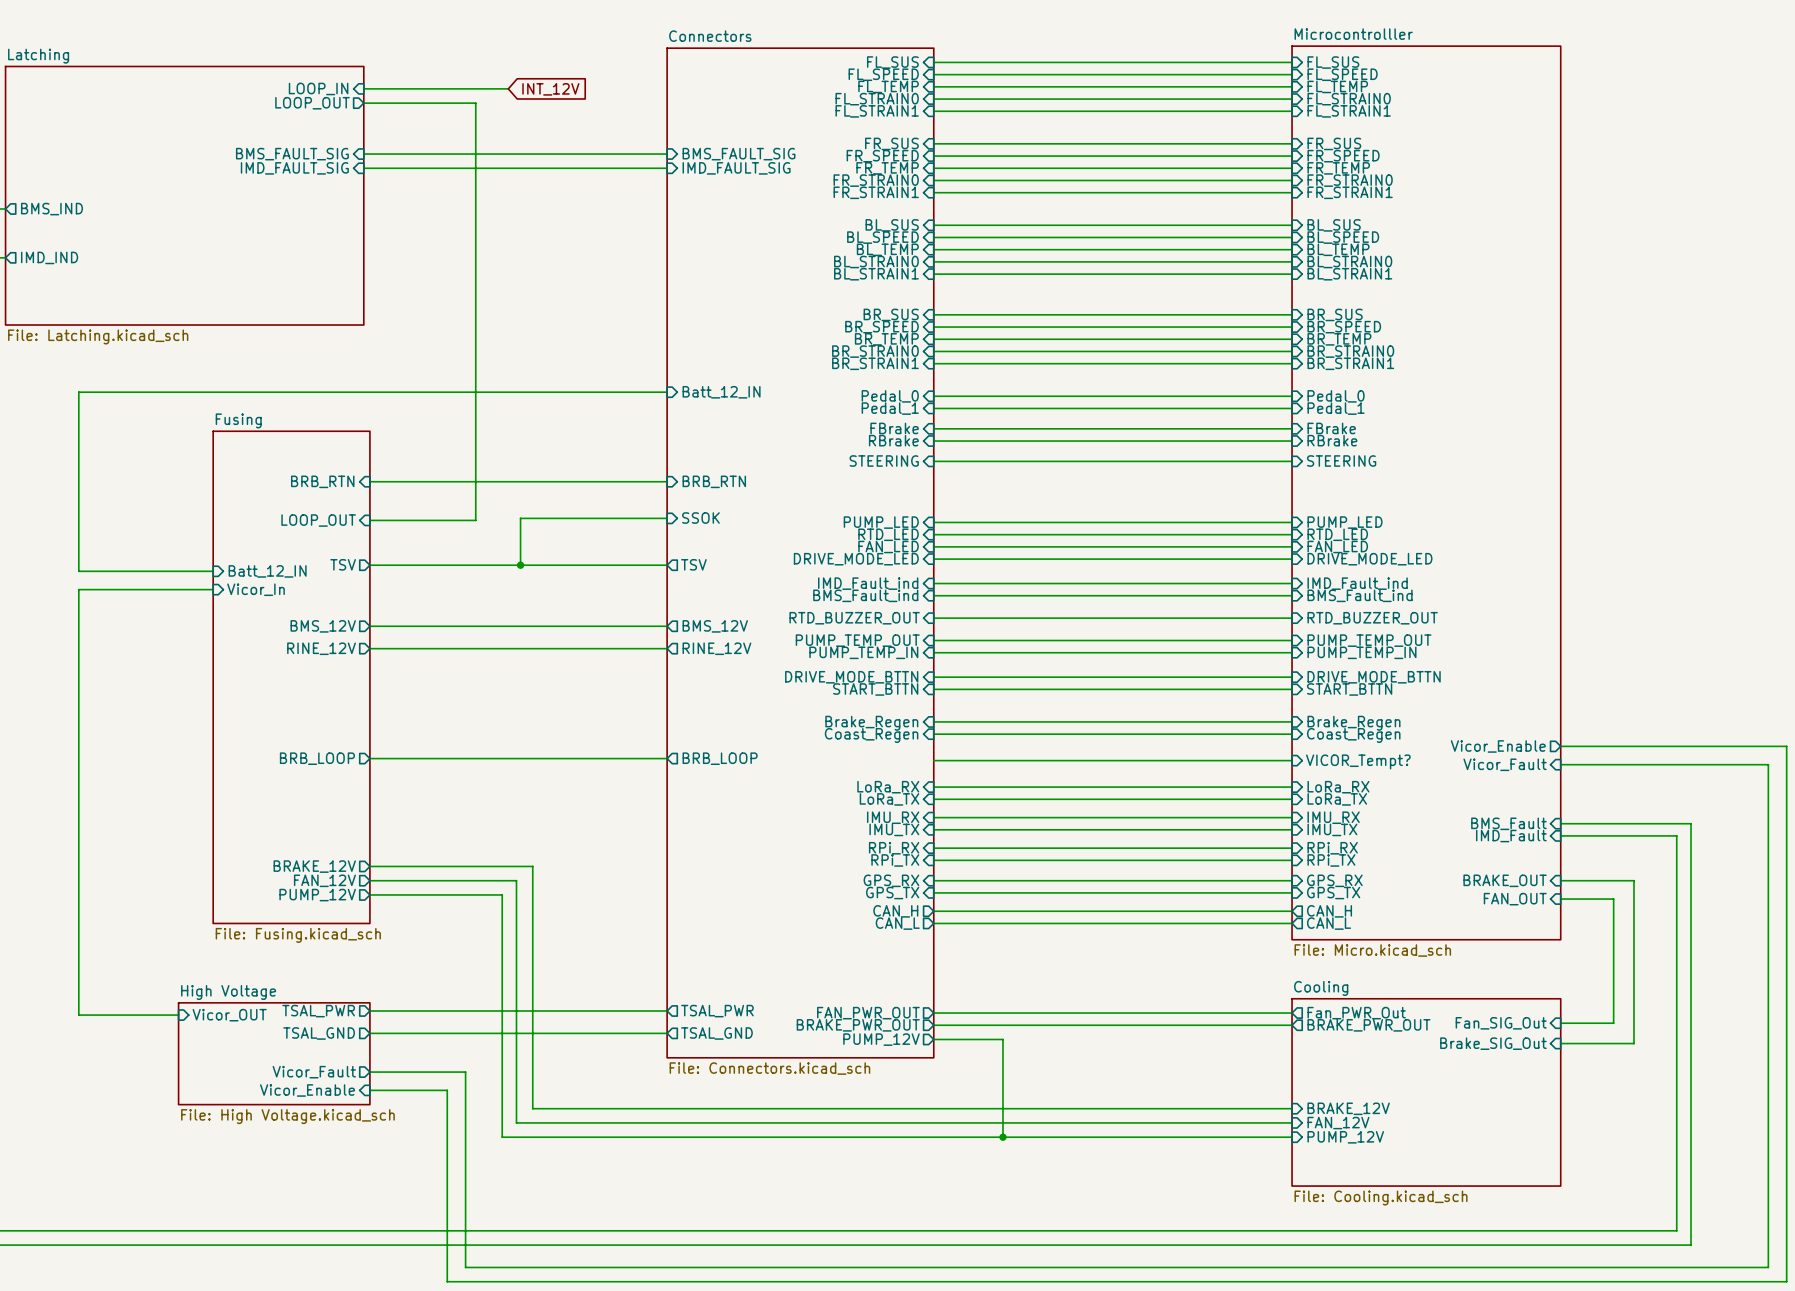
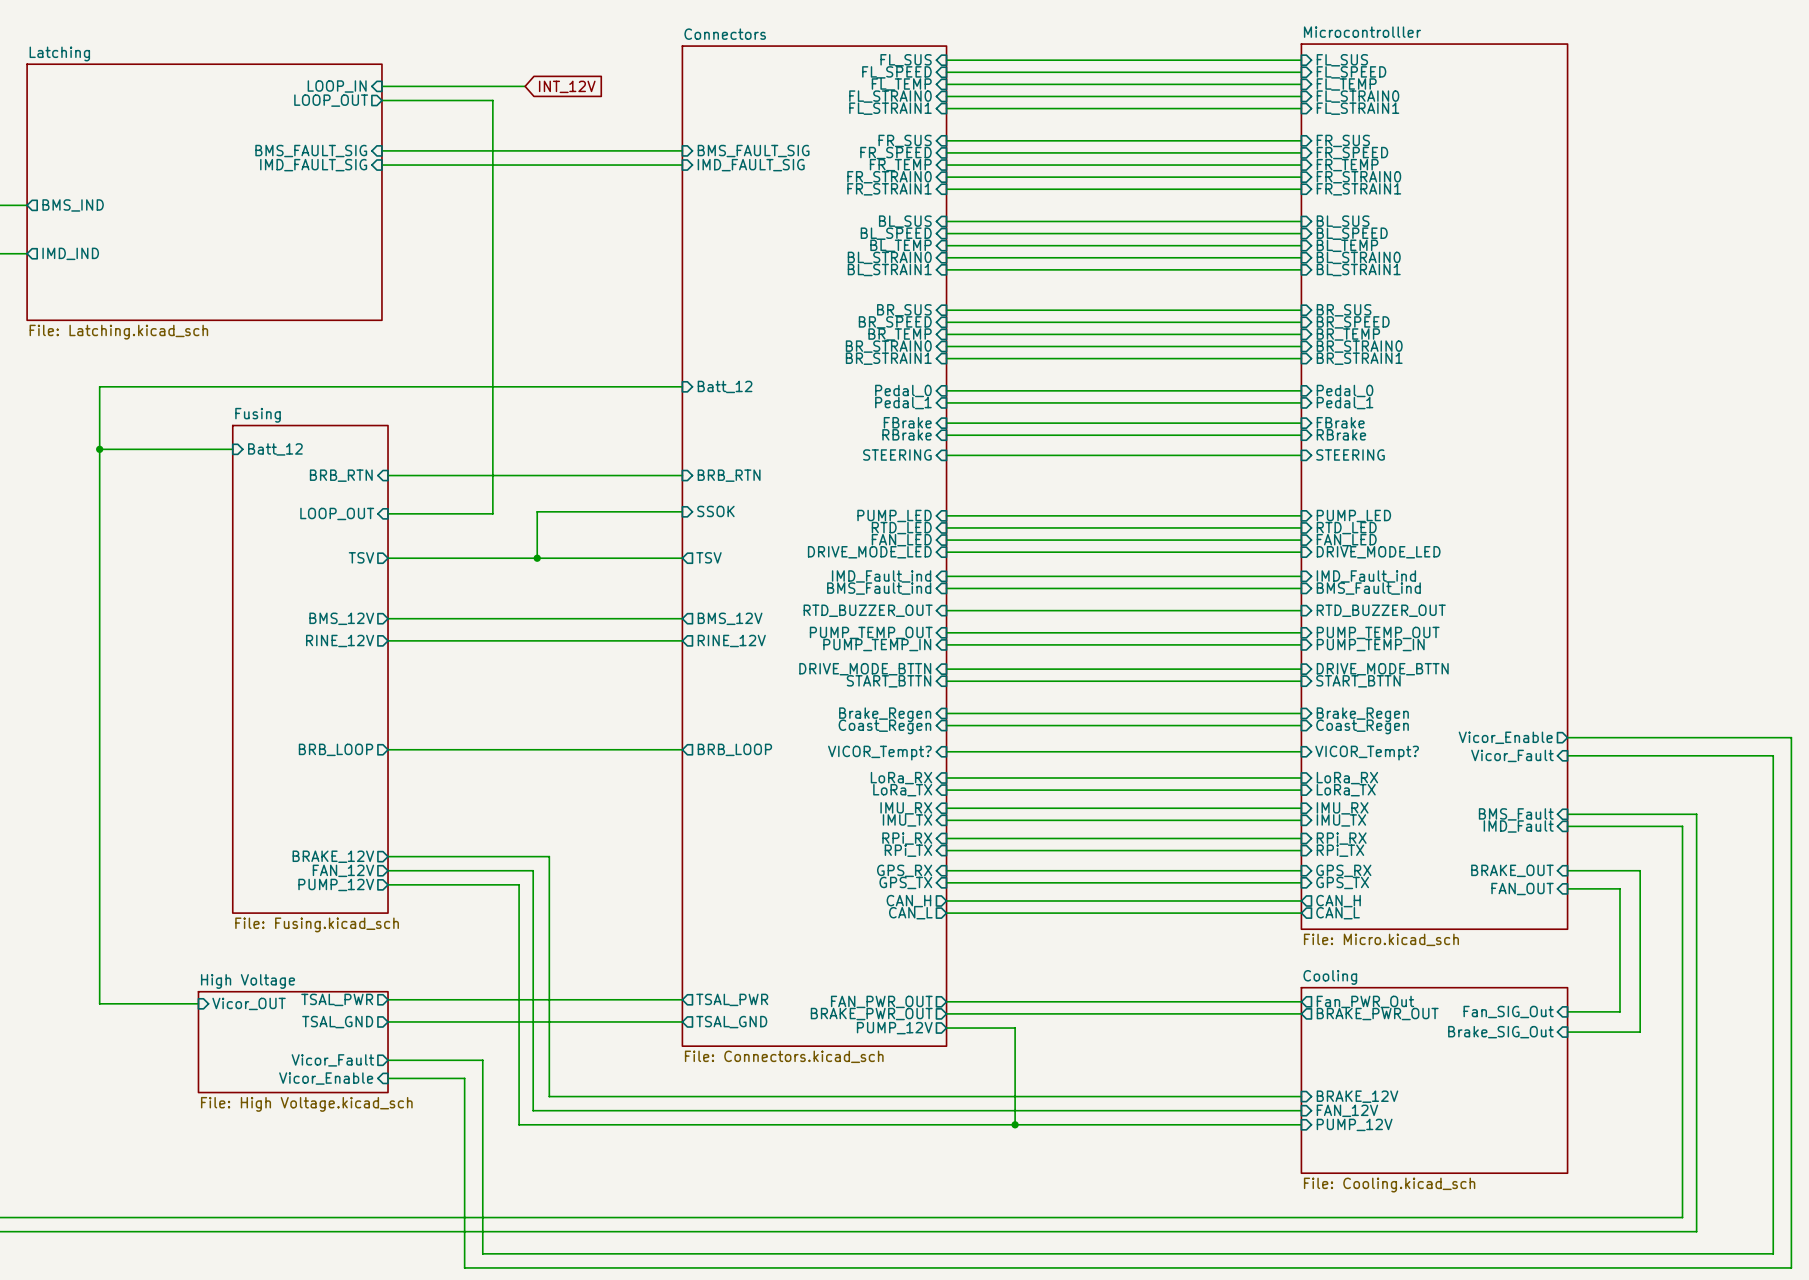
sheet pin: Batt_12_IN (721, 392) -> Batt_12 (725, 386)
junction: none -> (99, 449)
sheet pin: none -> Batt_12 (275, 449)
wire: (78, 571) (213, 571) -> (99, 564) (99, 582)
sheet pin: Batt_12_IN (267, 571) -> none
wire: (78, 589) (213, 589) -> (99, 449) (232, 449)
sheet pin: Vicor_In (255, 589) -> none
sheet pin: none -> VICOR_Tempt? (879, 753)

